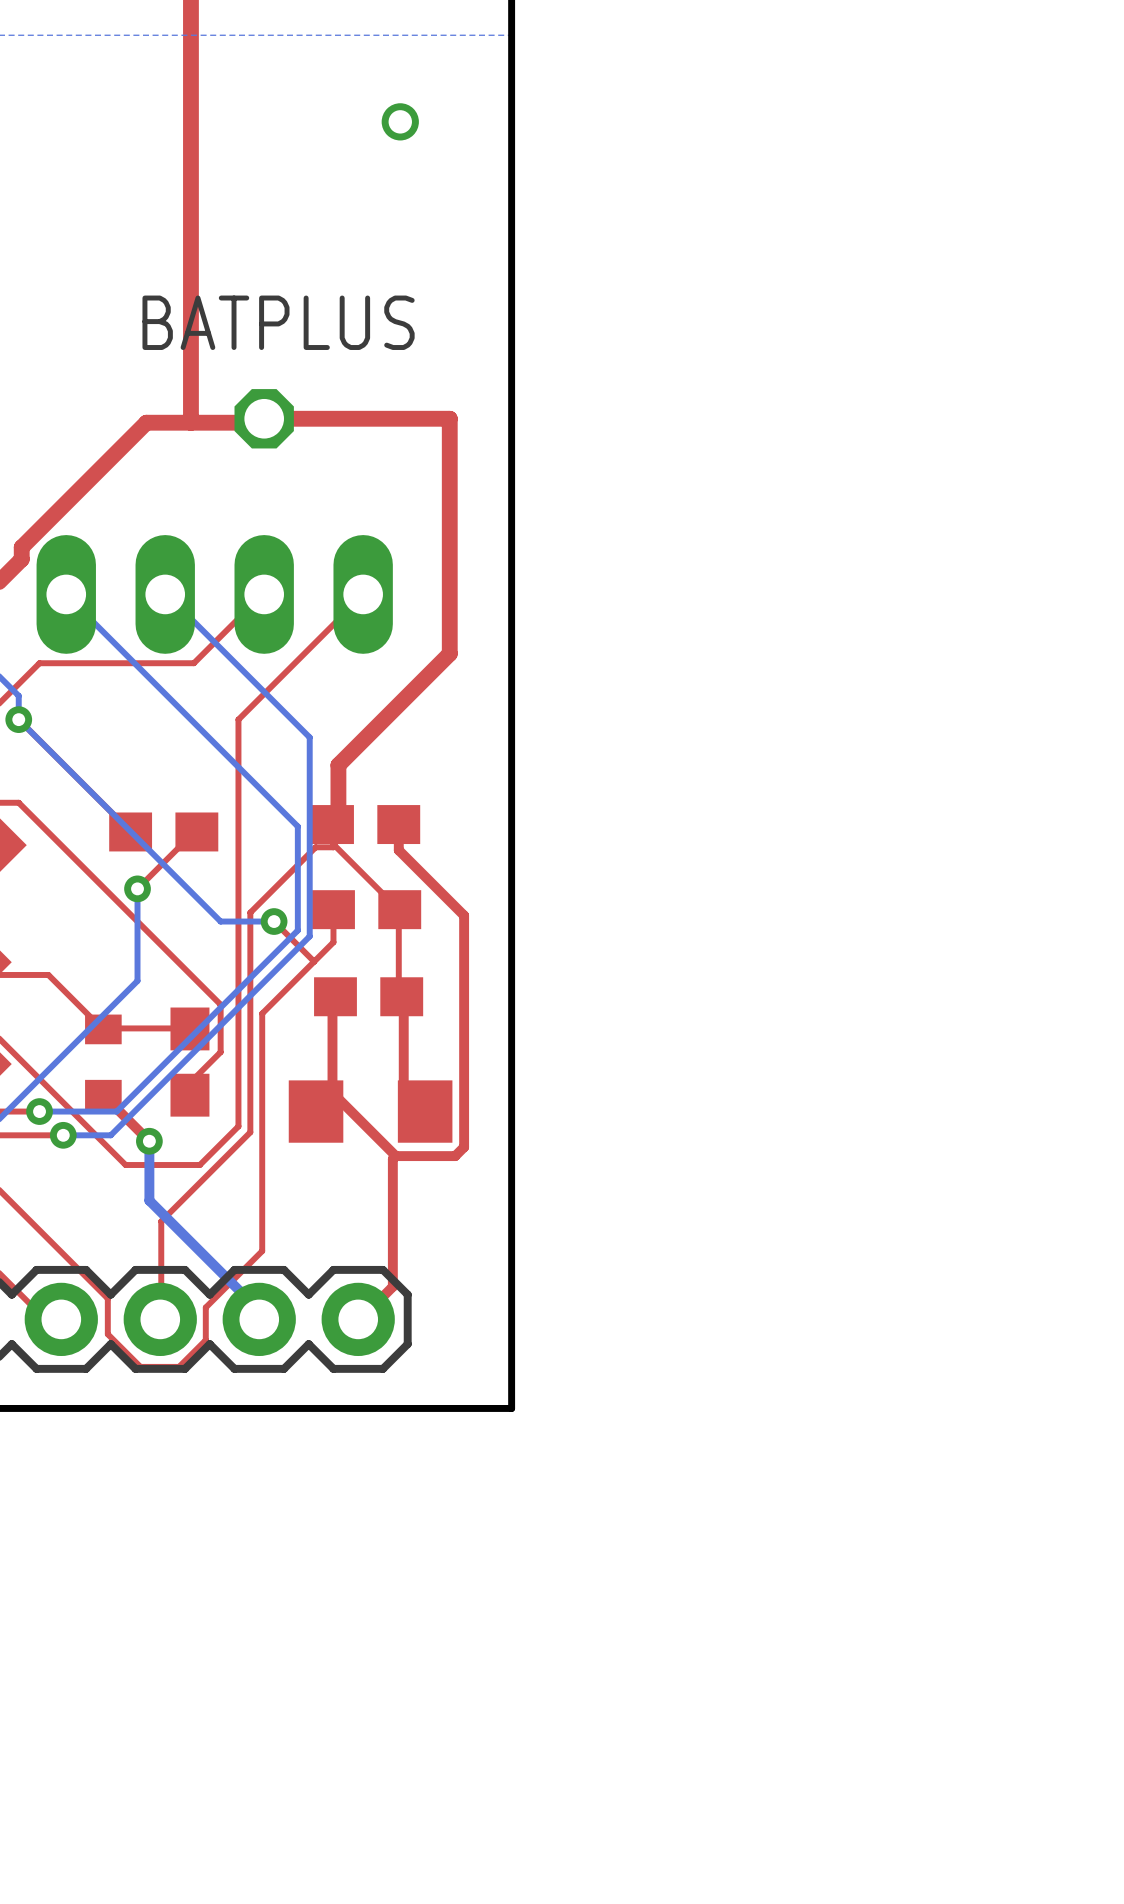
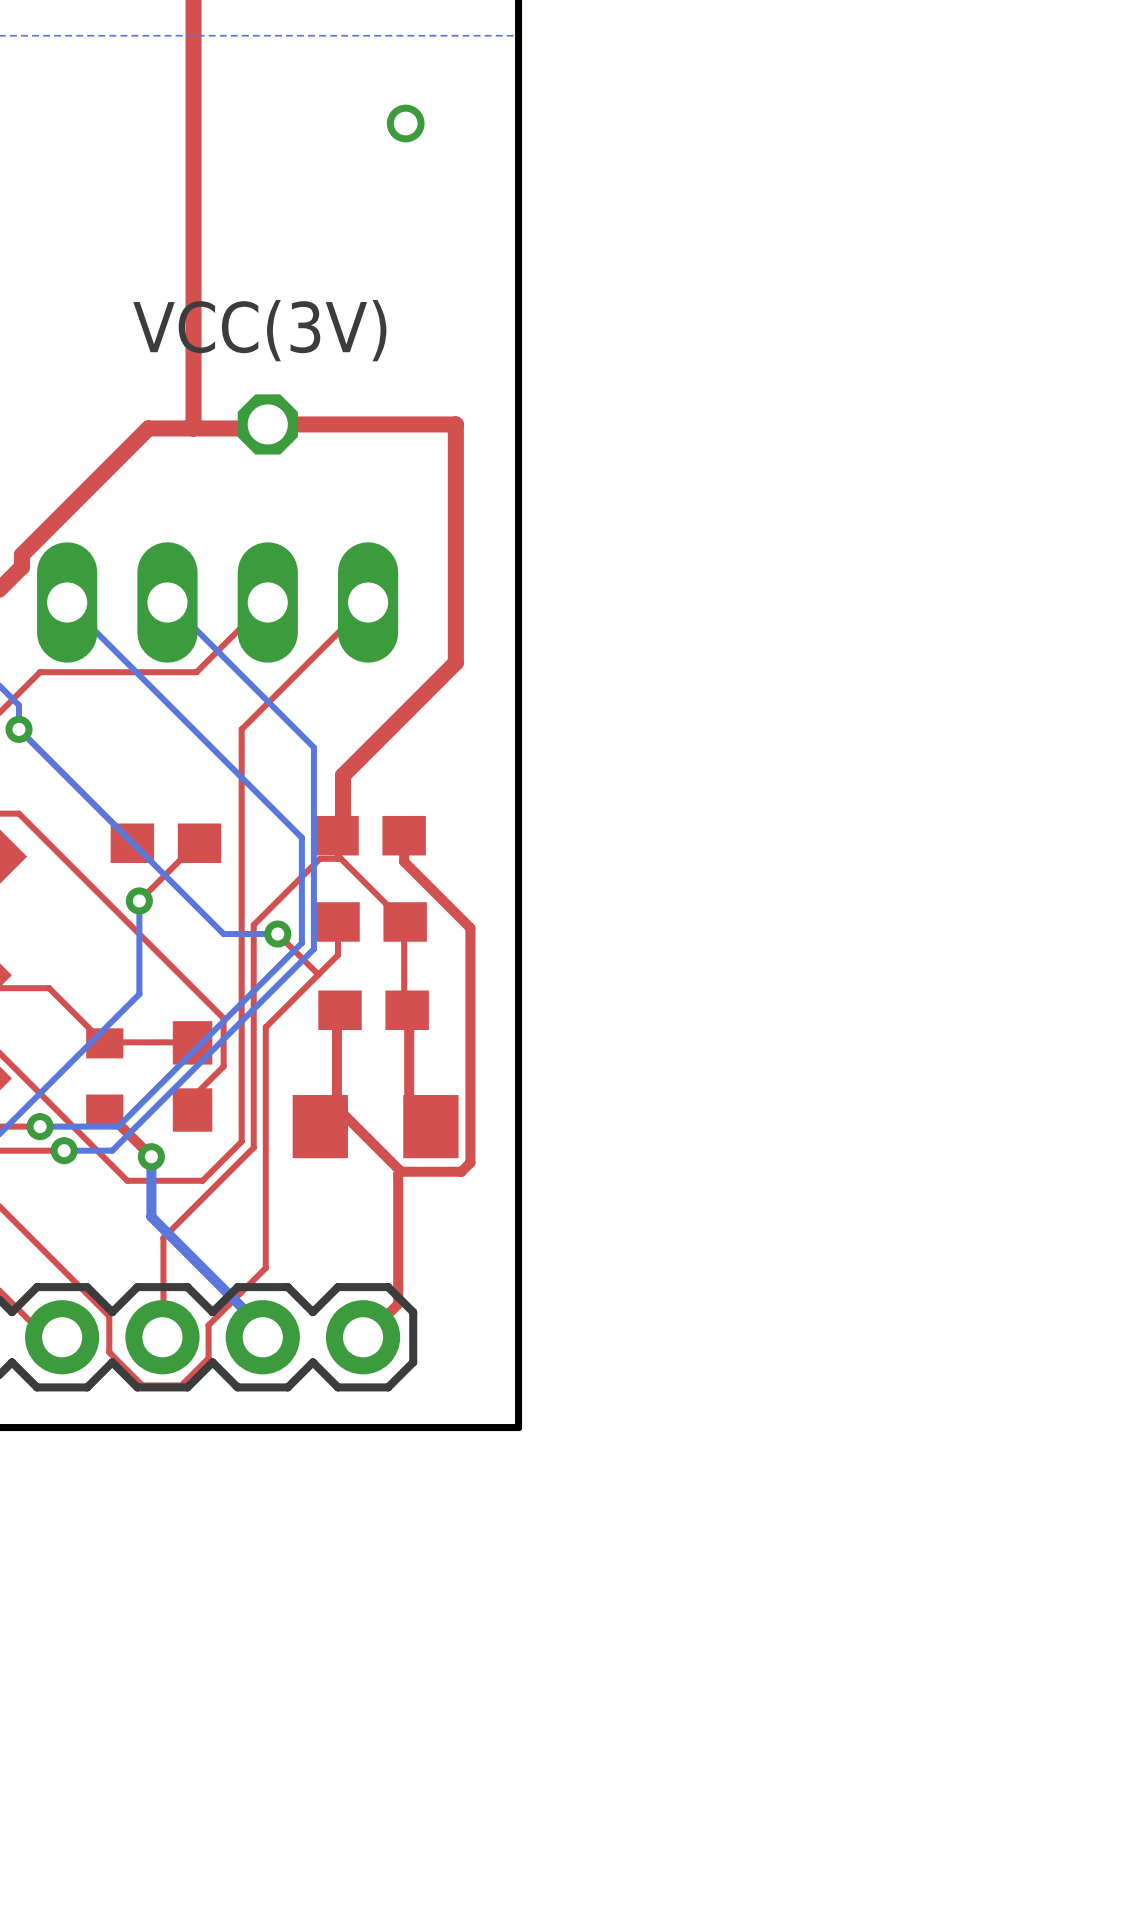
BATPLUS name: BATPLUS (278, 322) -> VCC(3V) (259, 330)

